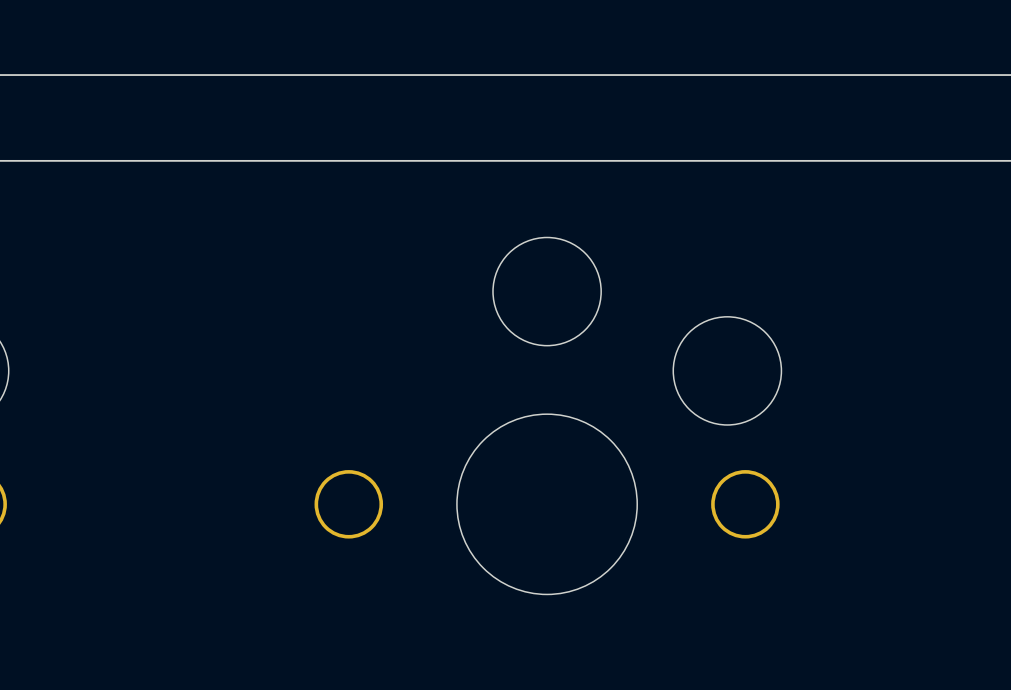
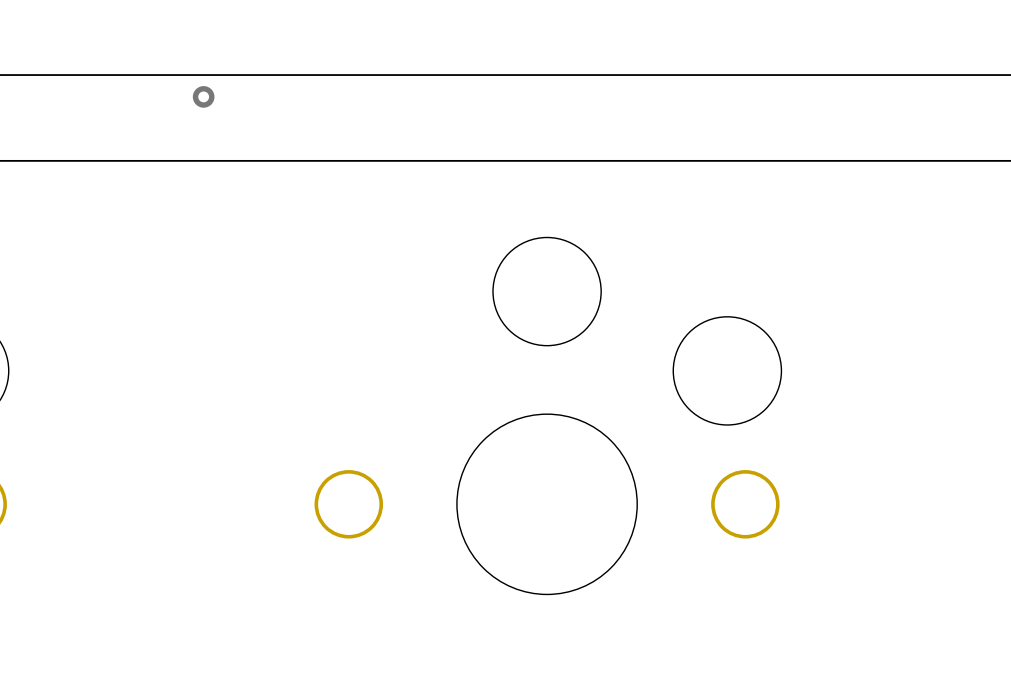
via: none -> (203, 96)

